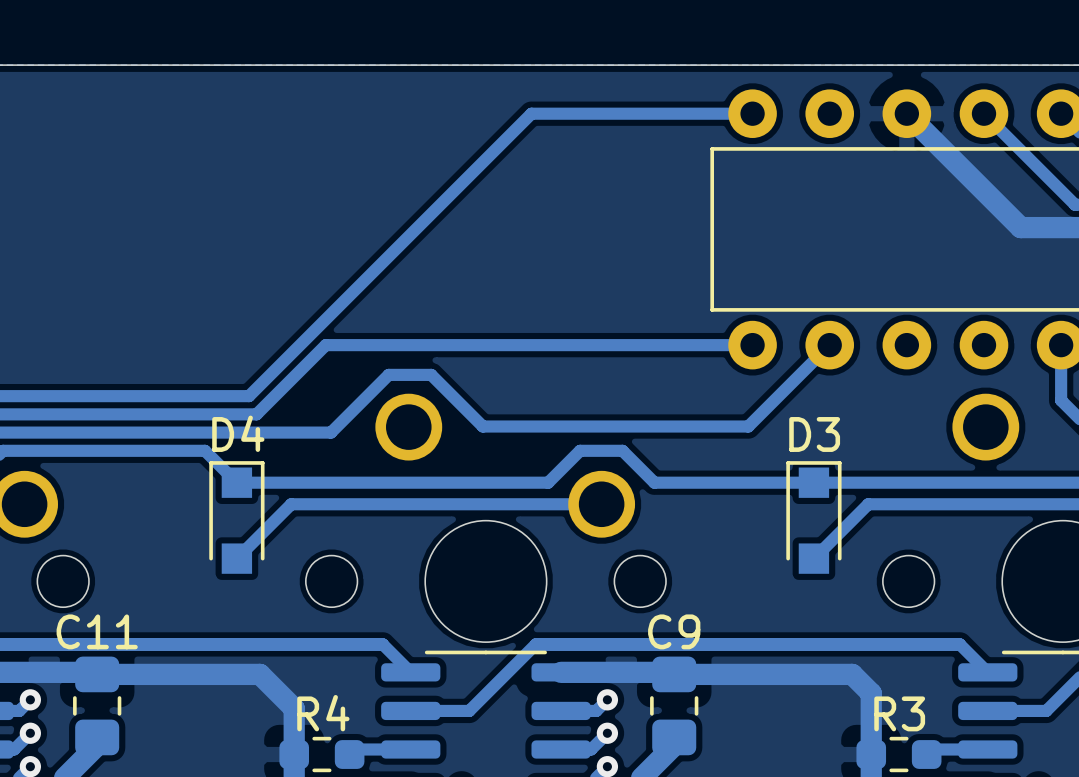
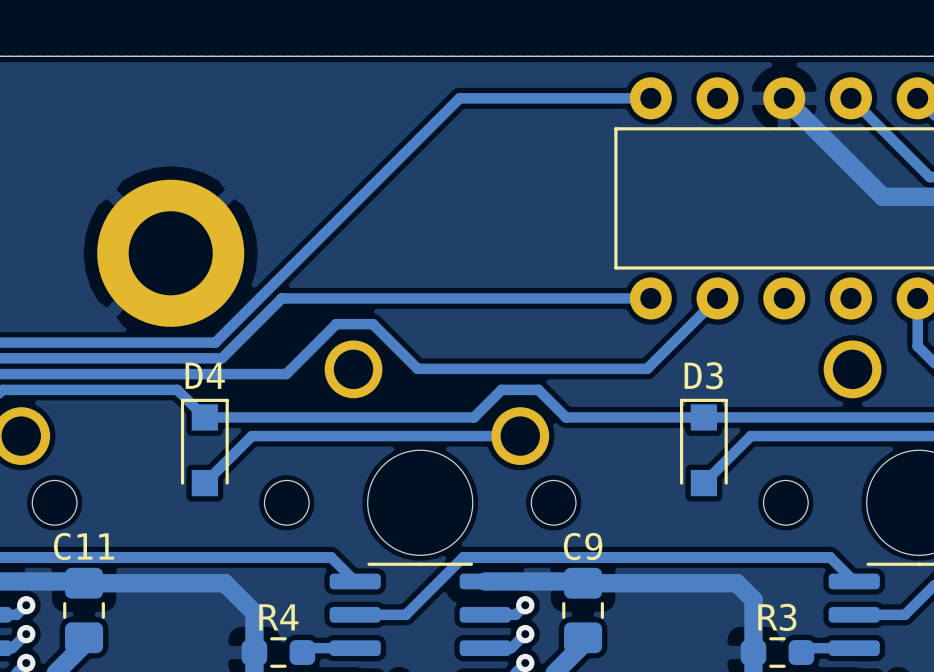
part: none -> (170, 253)

